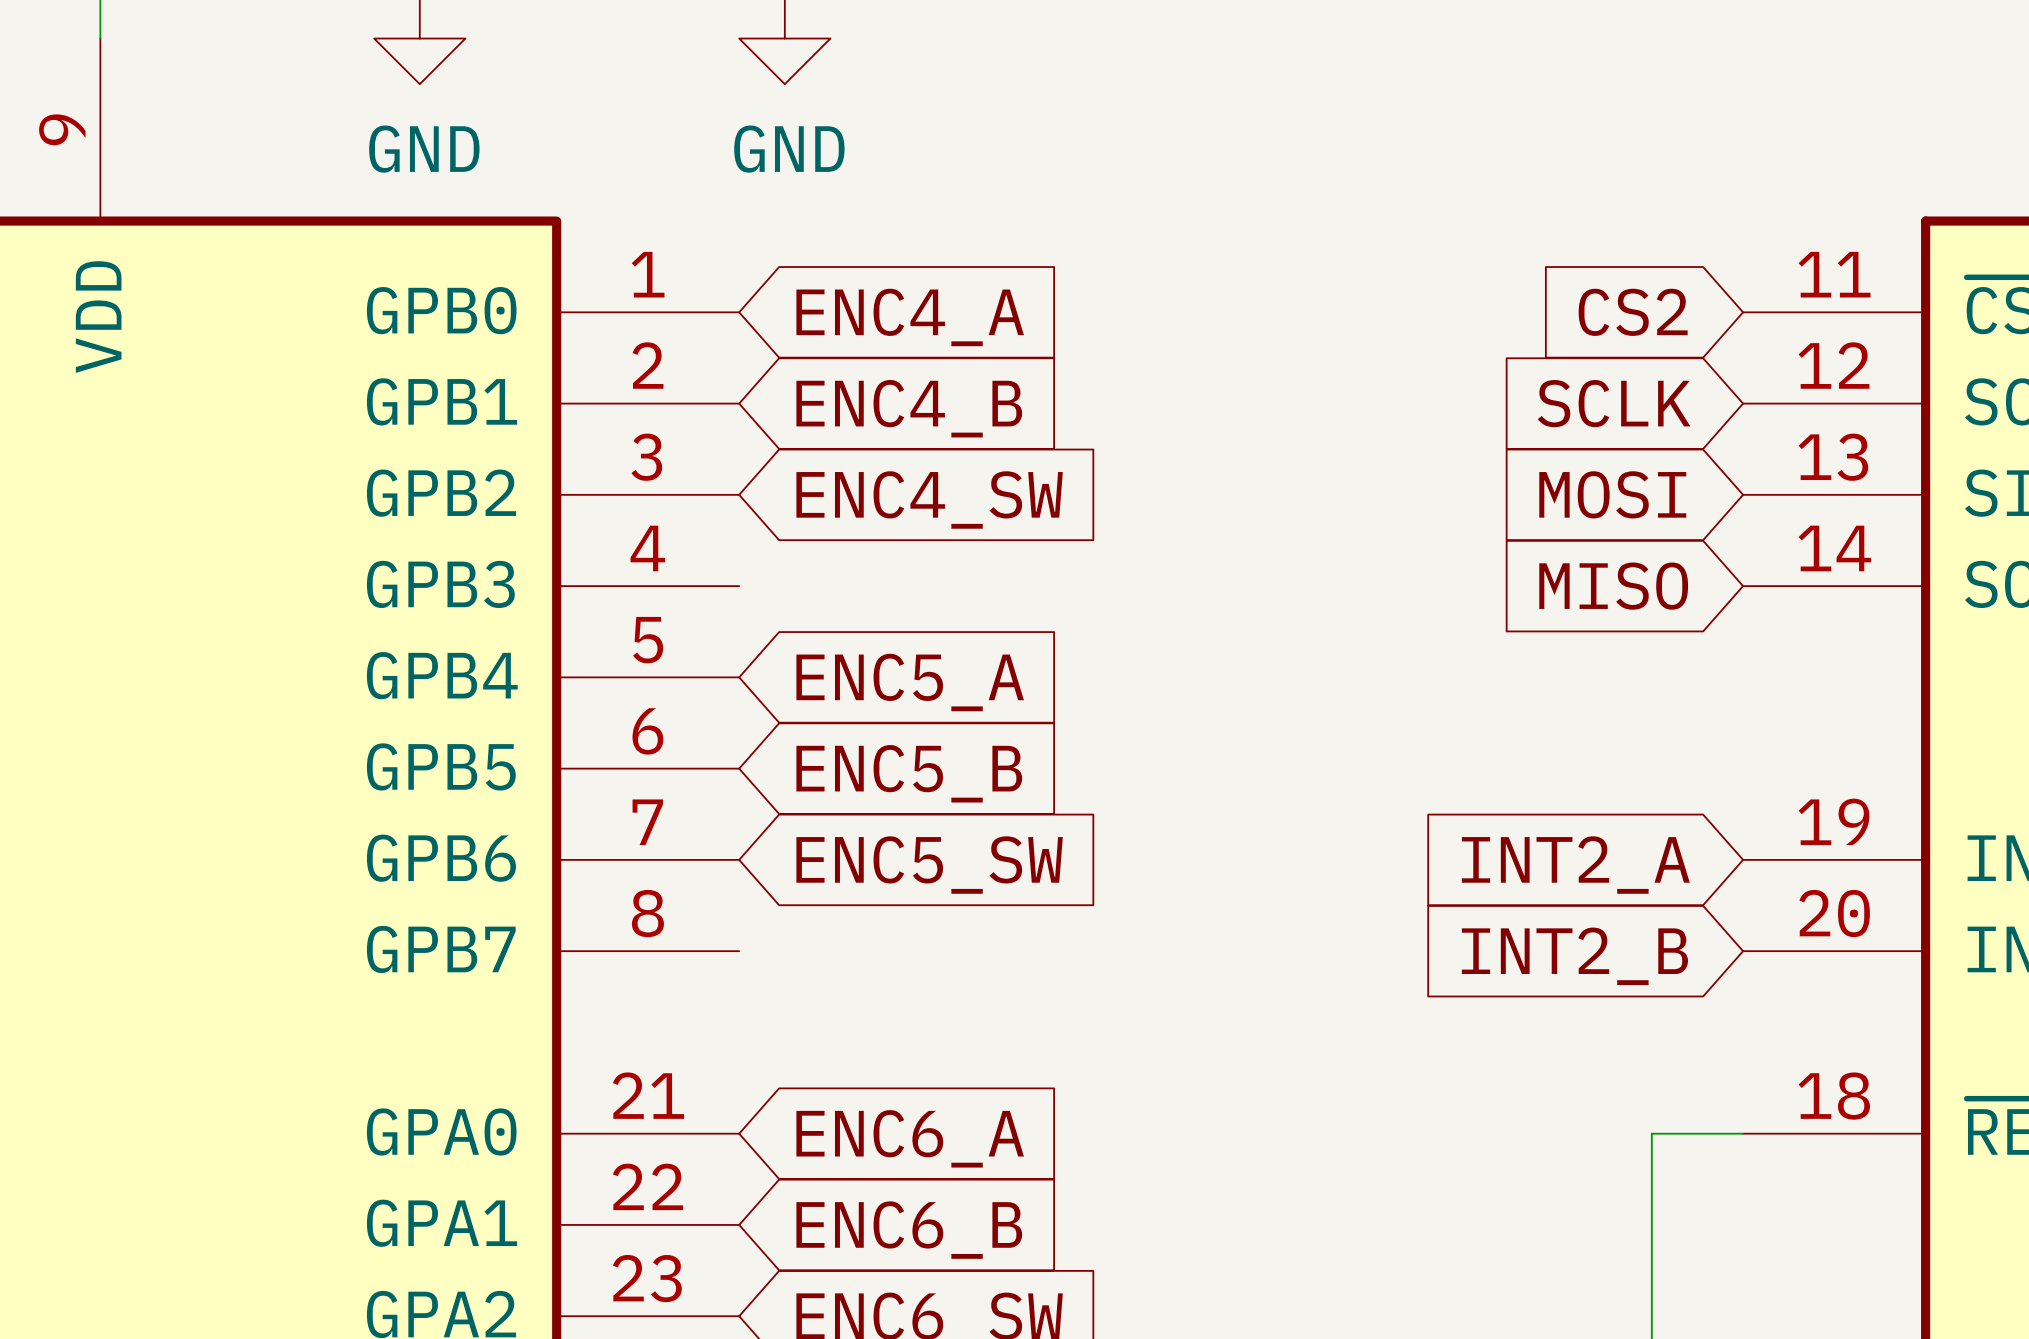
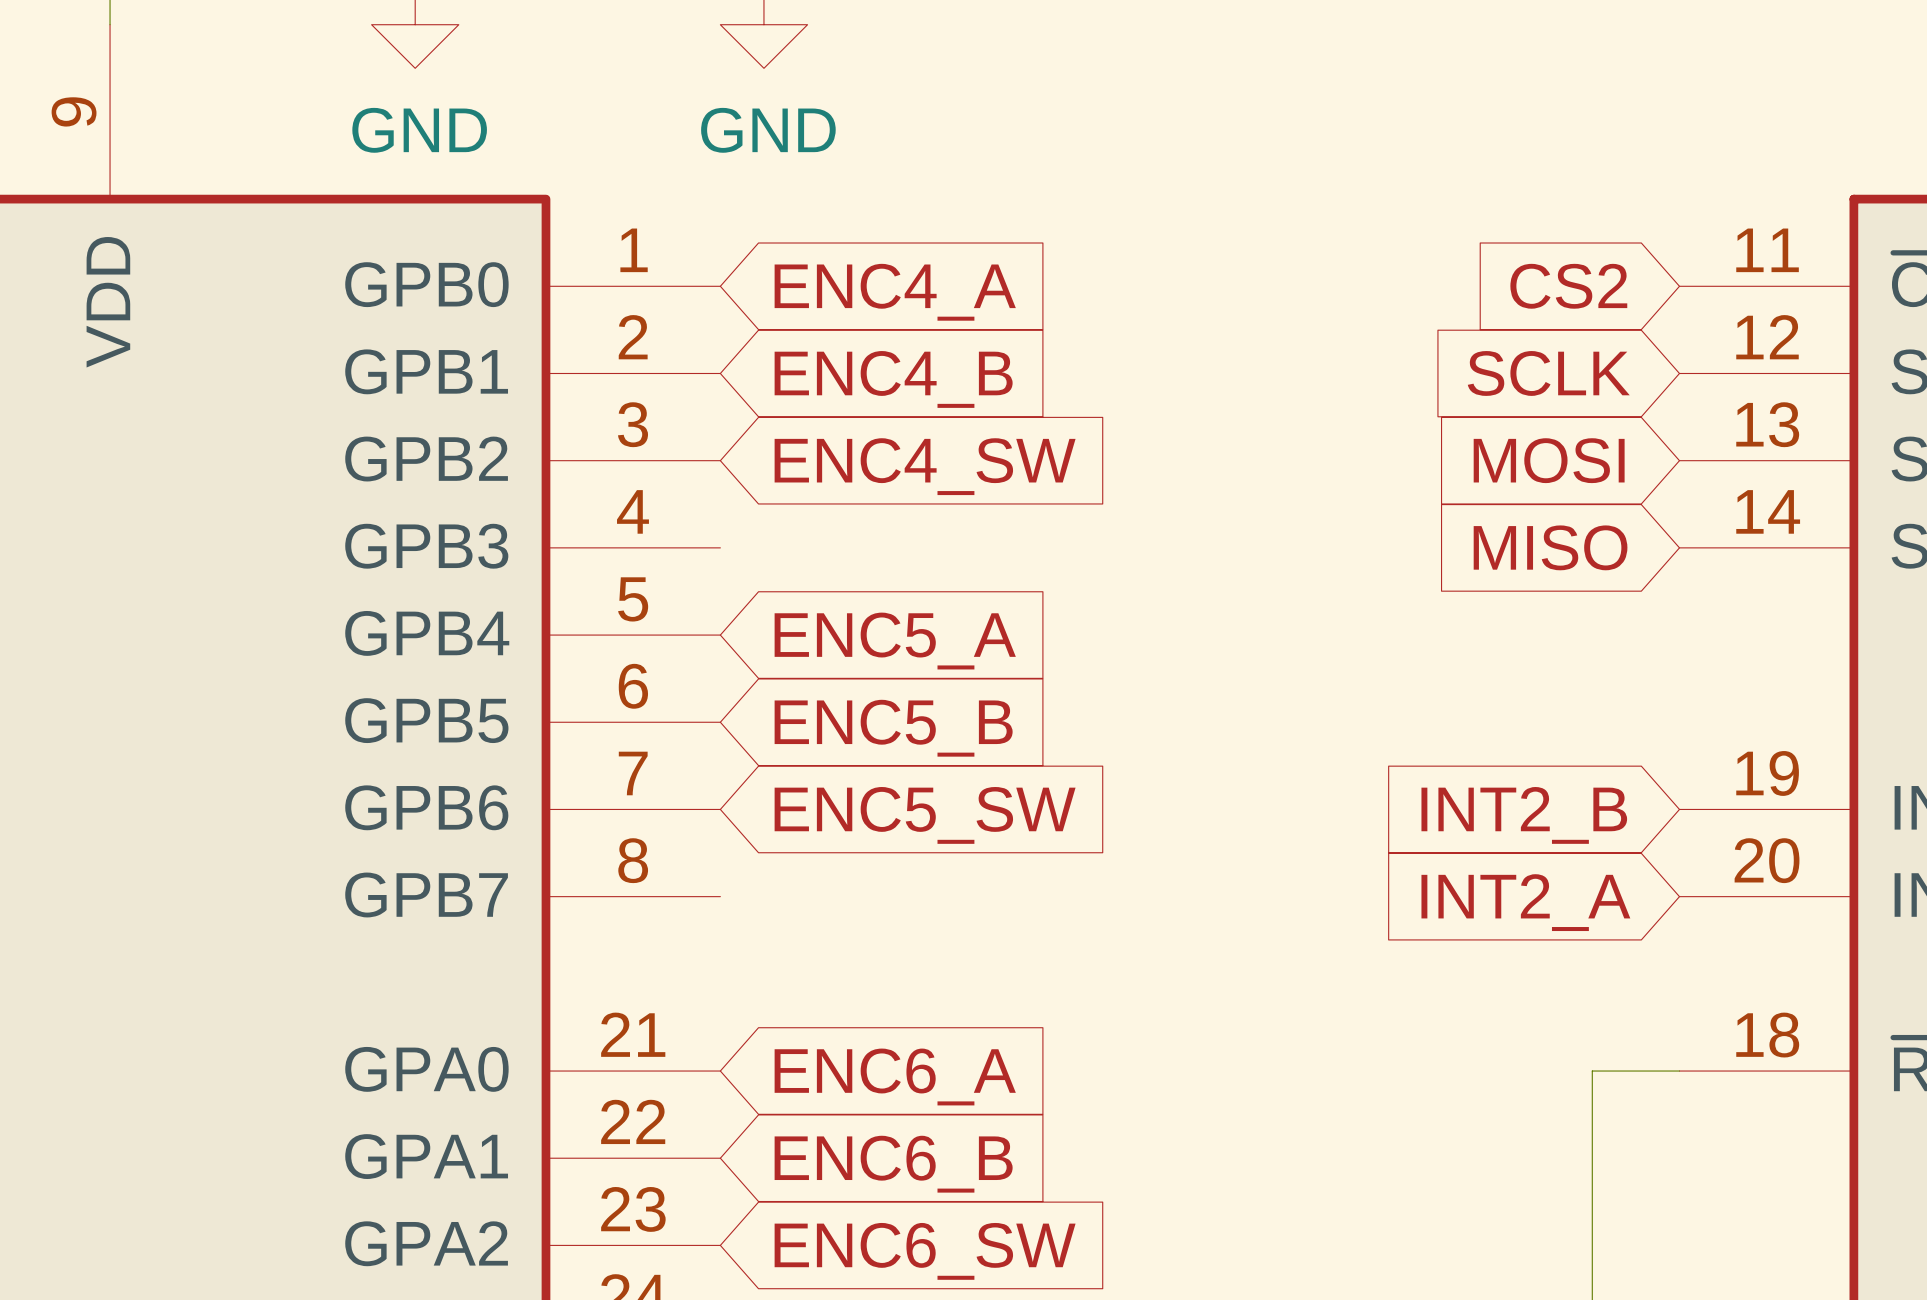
global label: INT2_A (1575, 865) -> INT2_B (1524, 815)
global label: INT2_B (1574, 956) -> INT2_A (1525, 902)

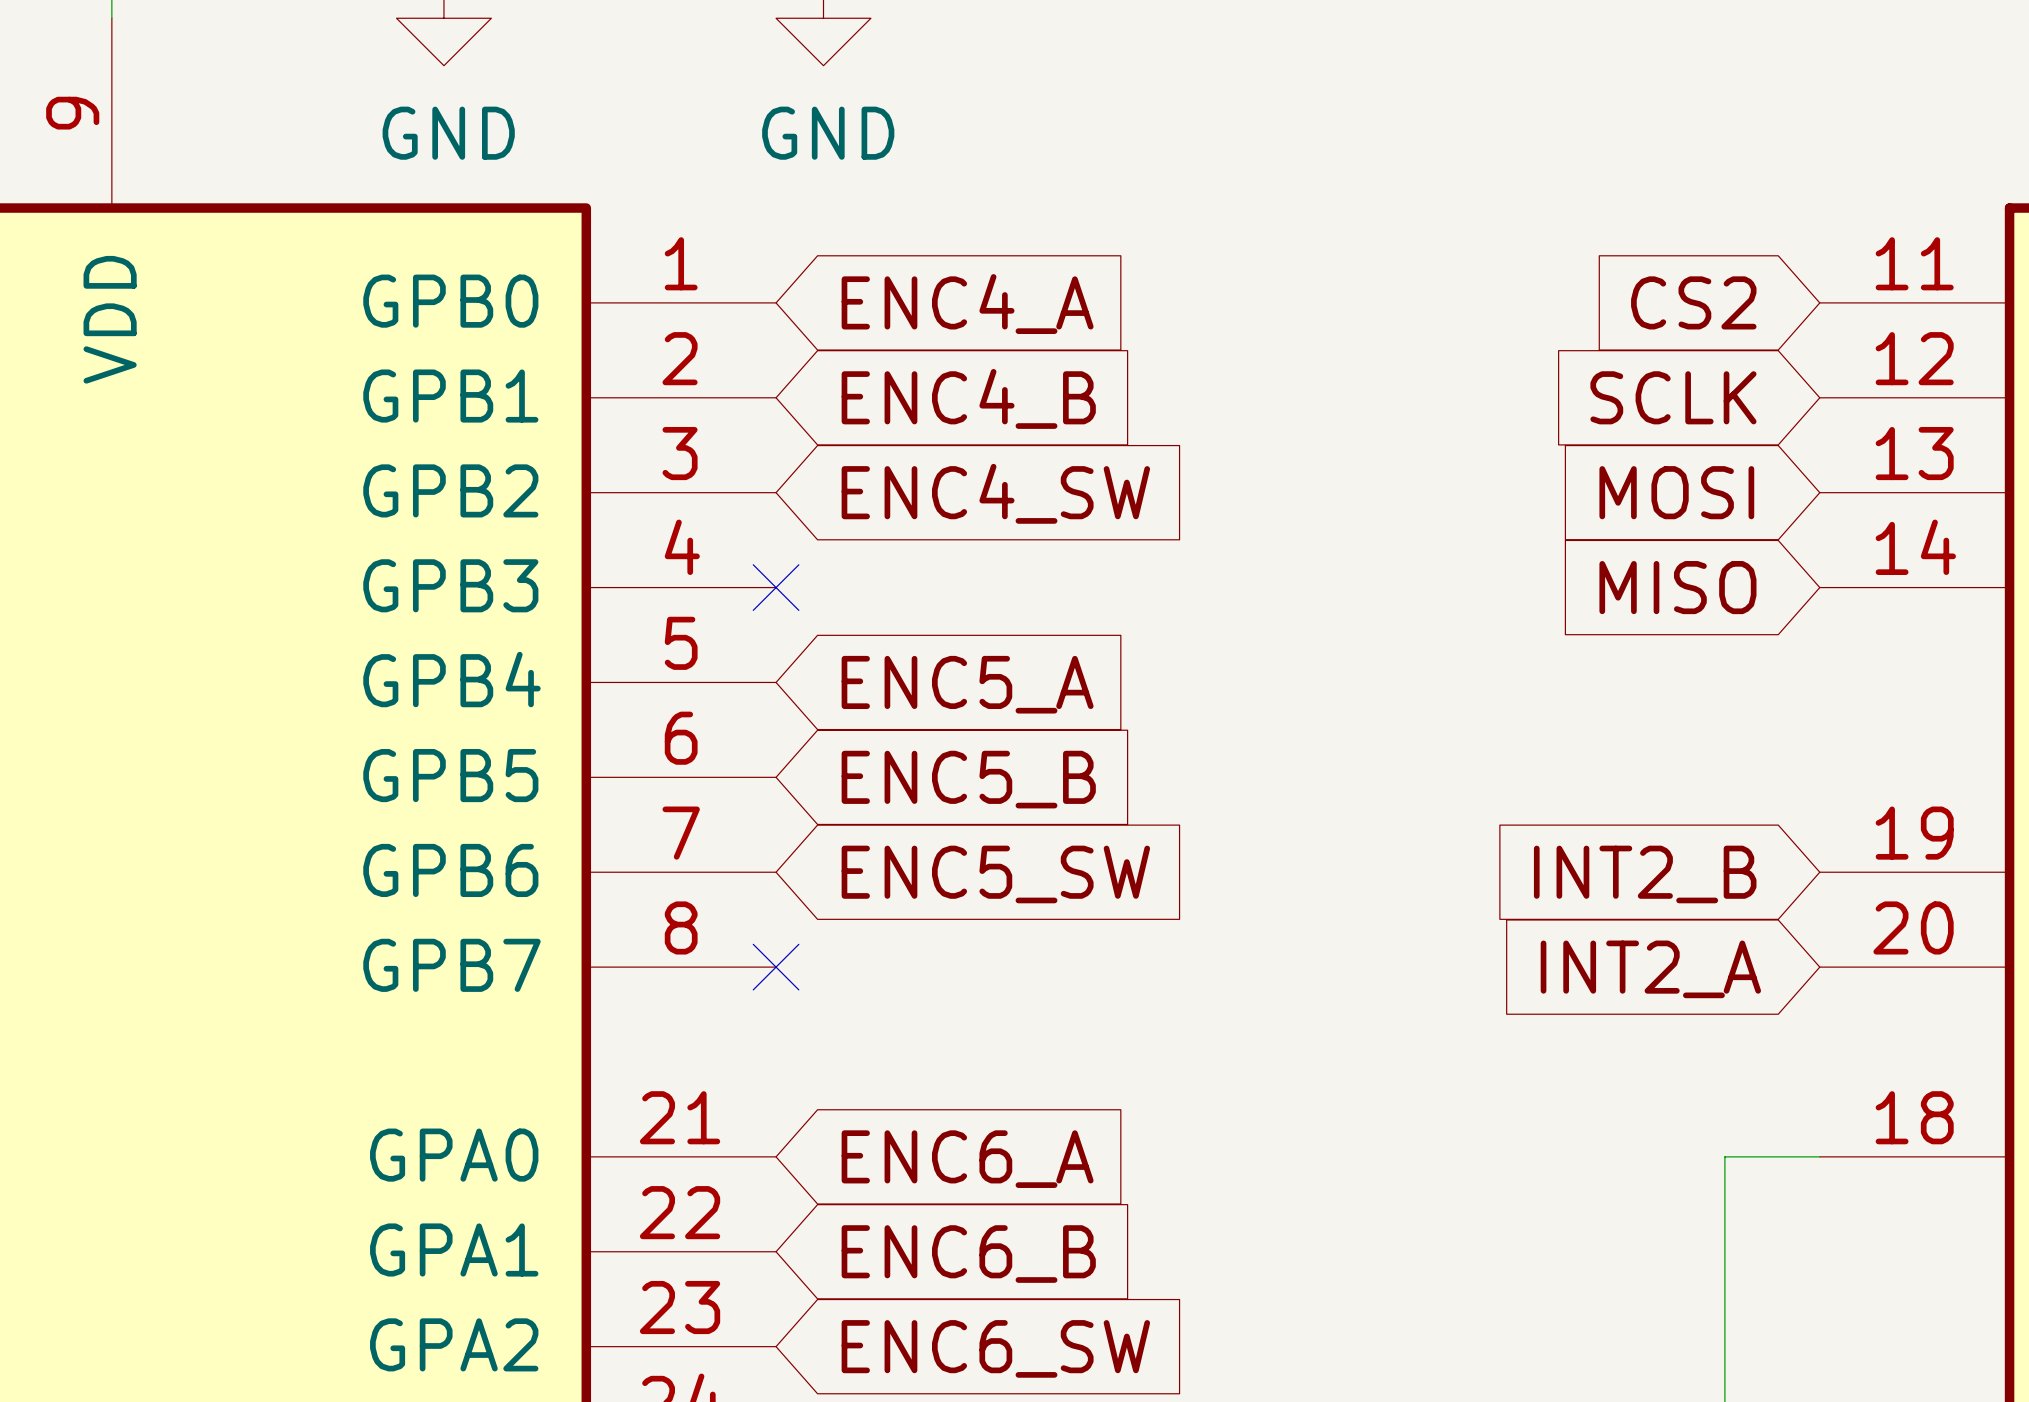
no-connect mark: none -> (776, 587)
no-connect mark: none -> (776, 967)

